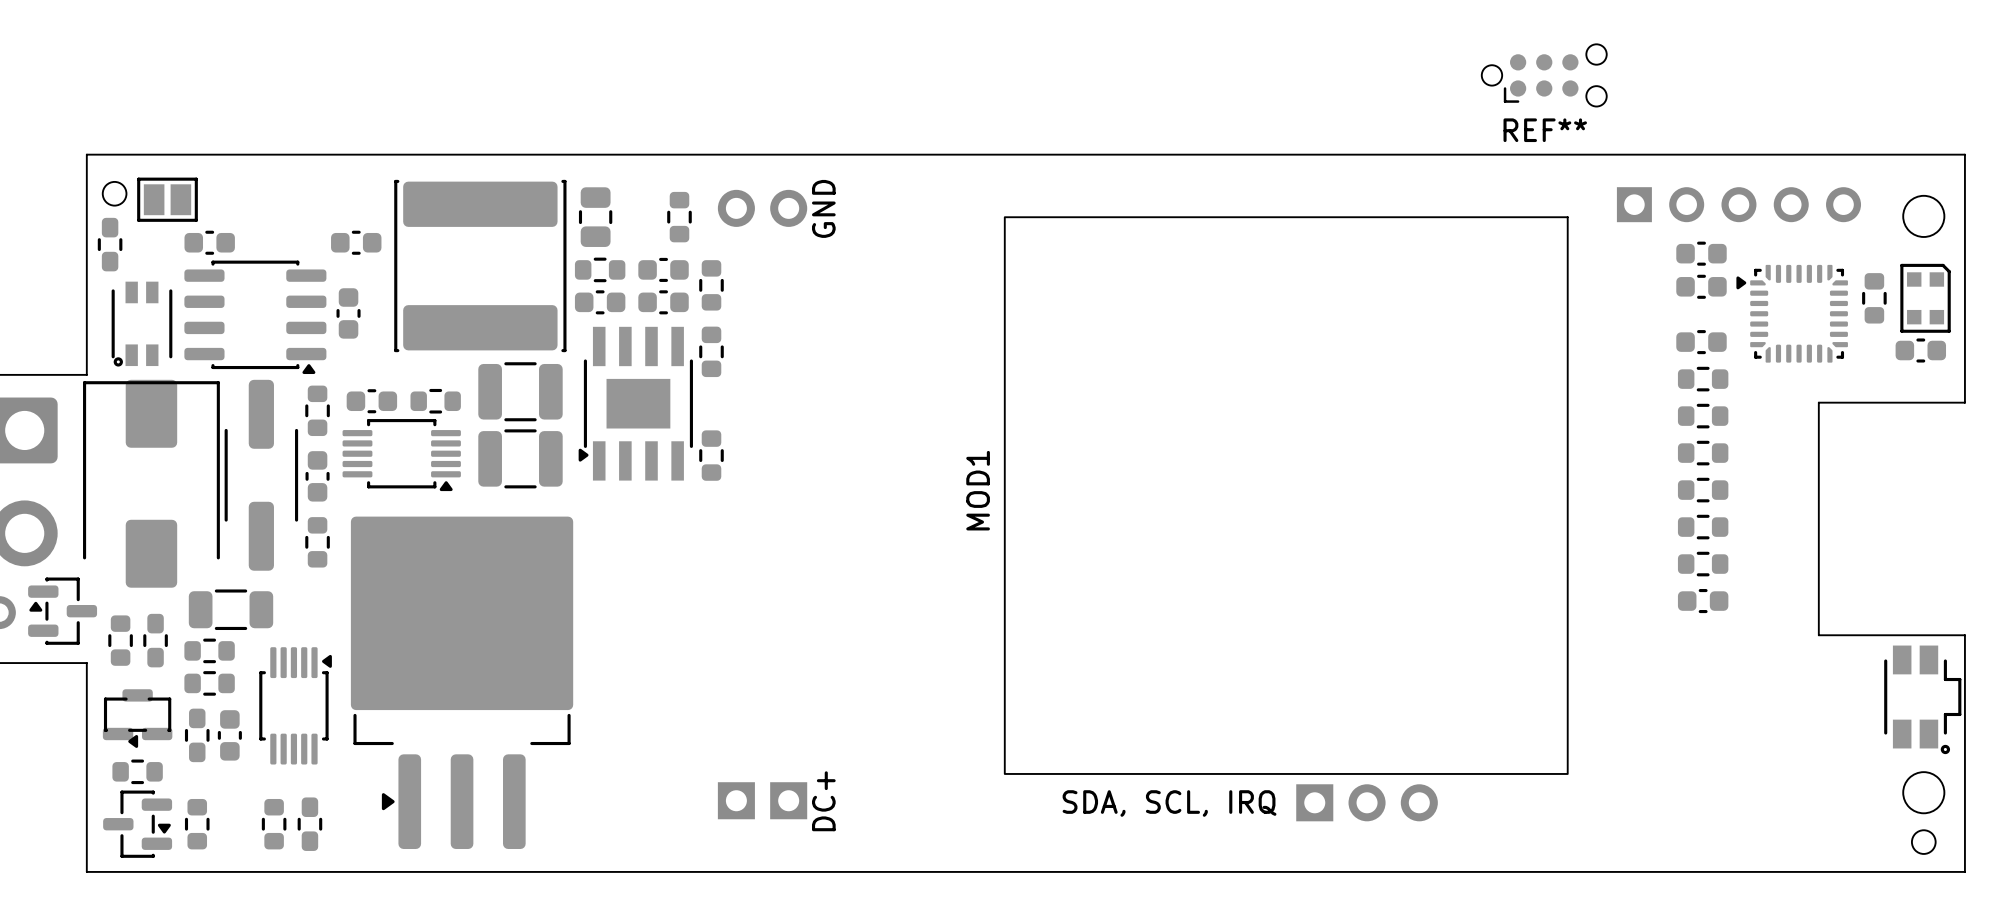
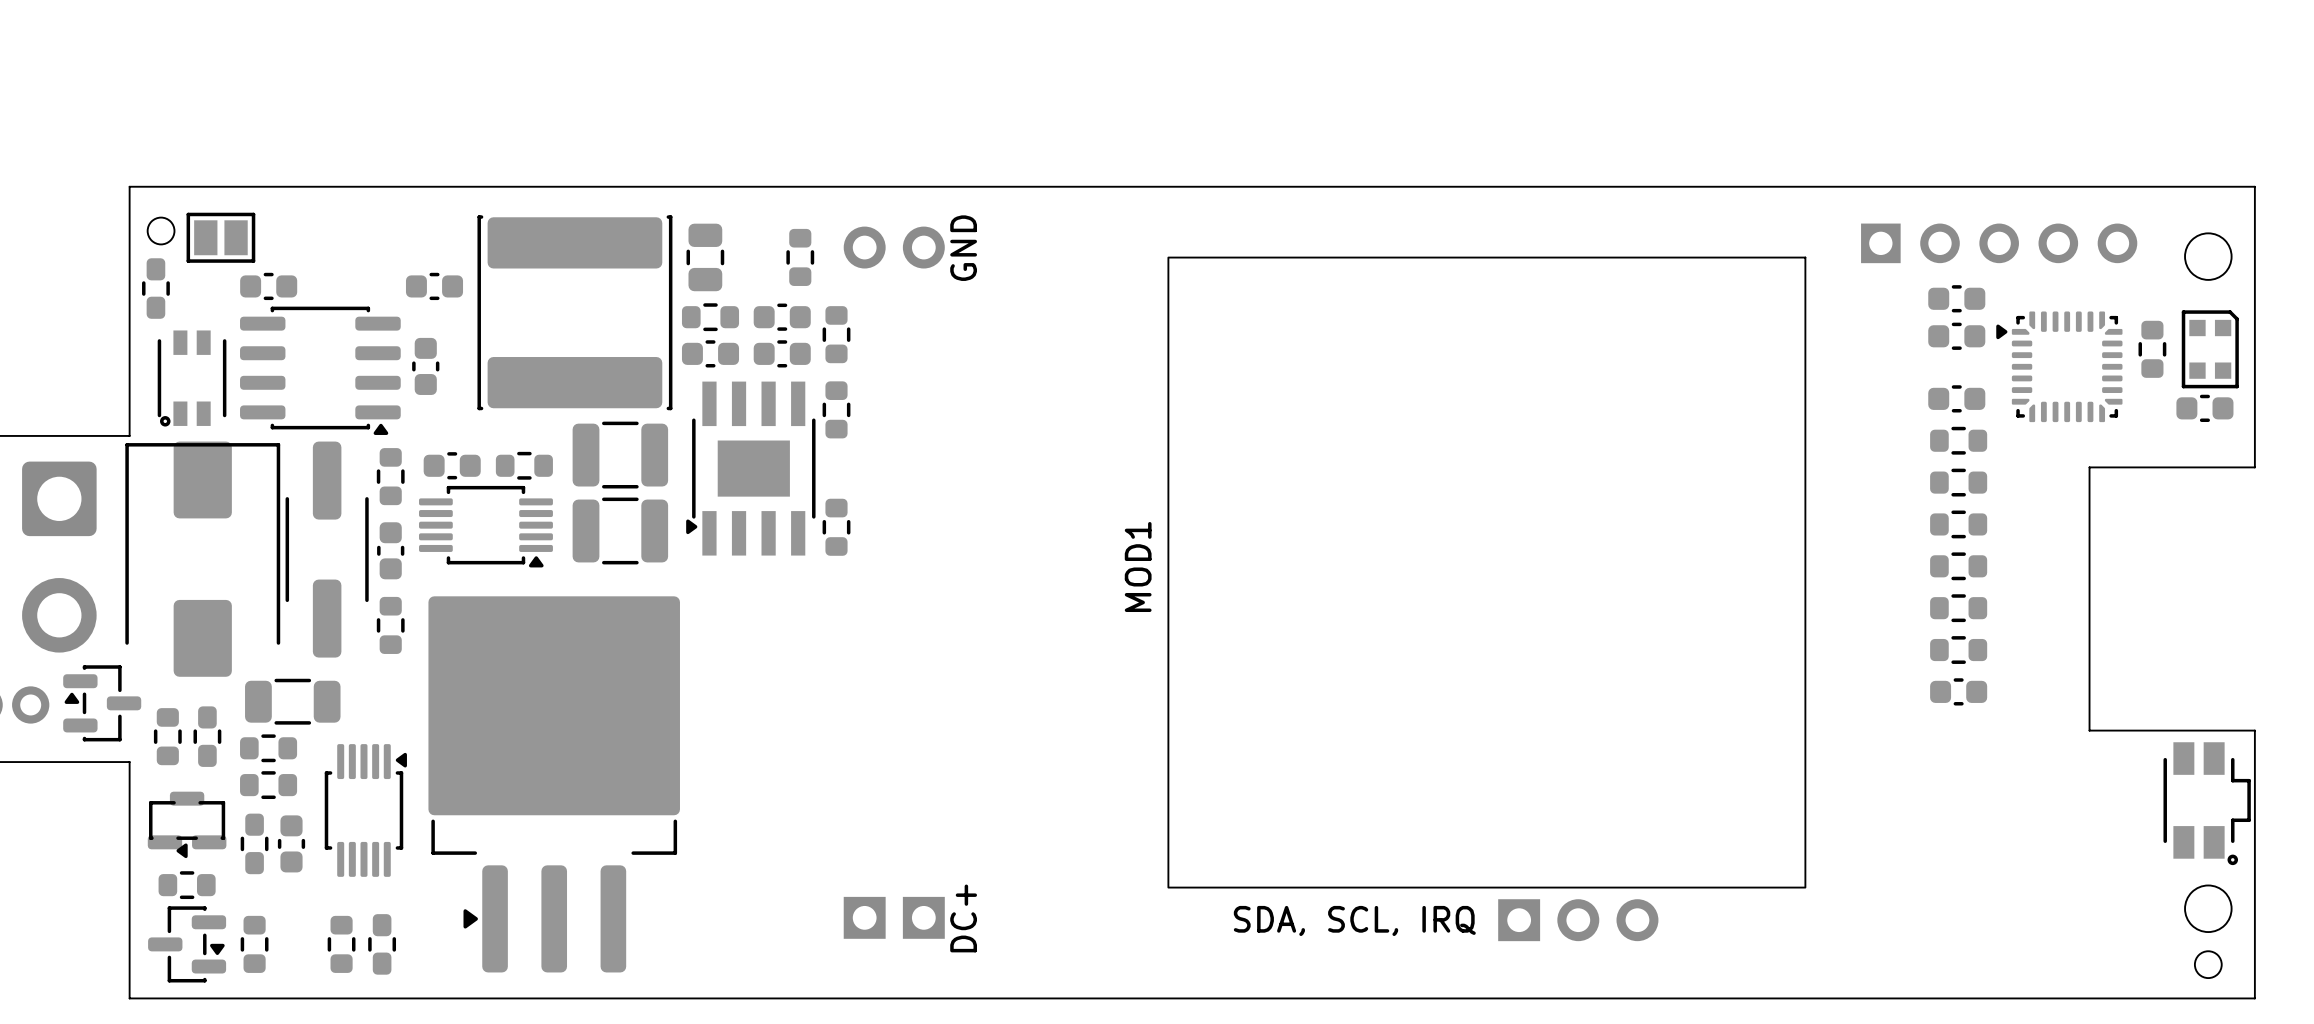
REF**: (1544, 75) -> none

